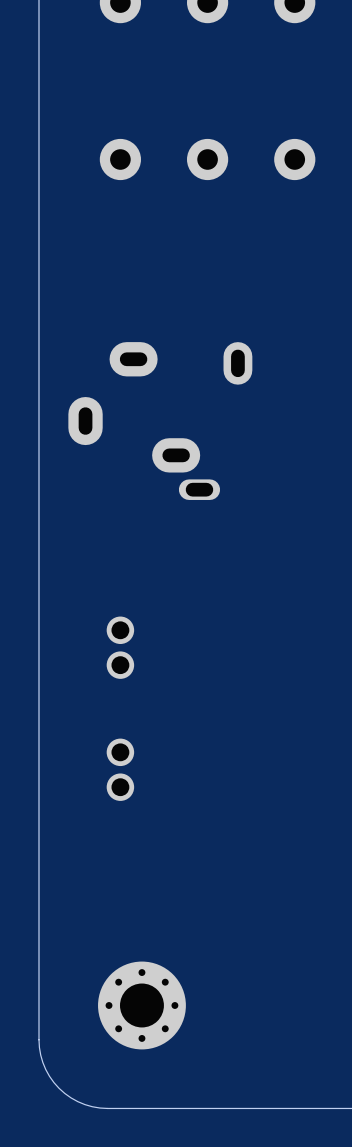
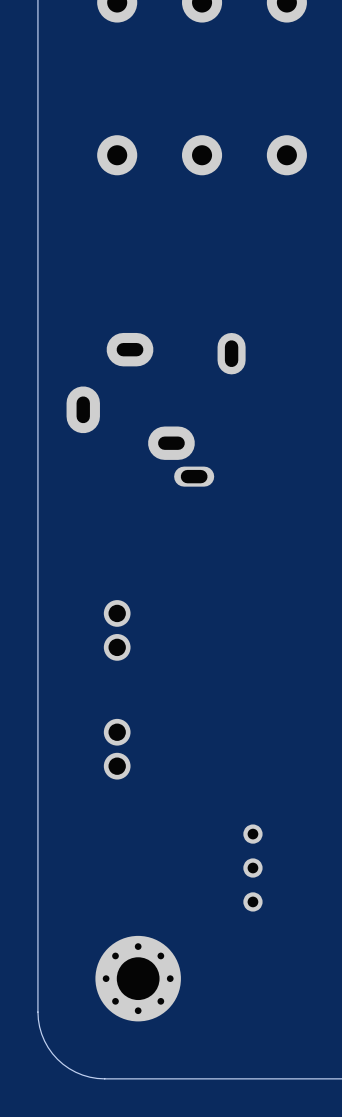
part: none -> (252, 868)

